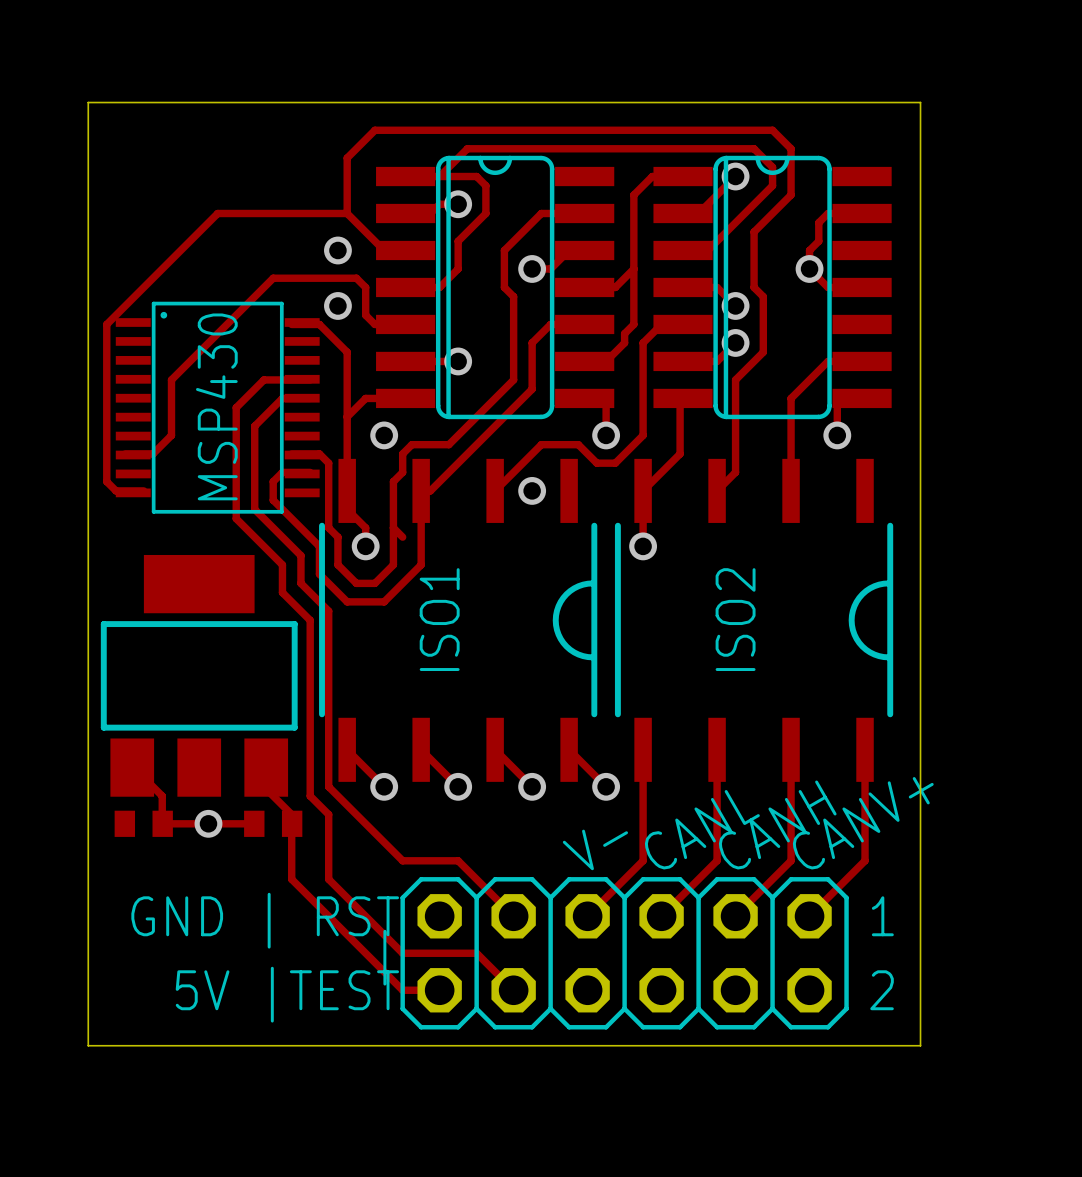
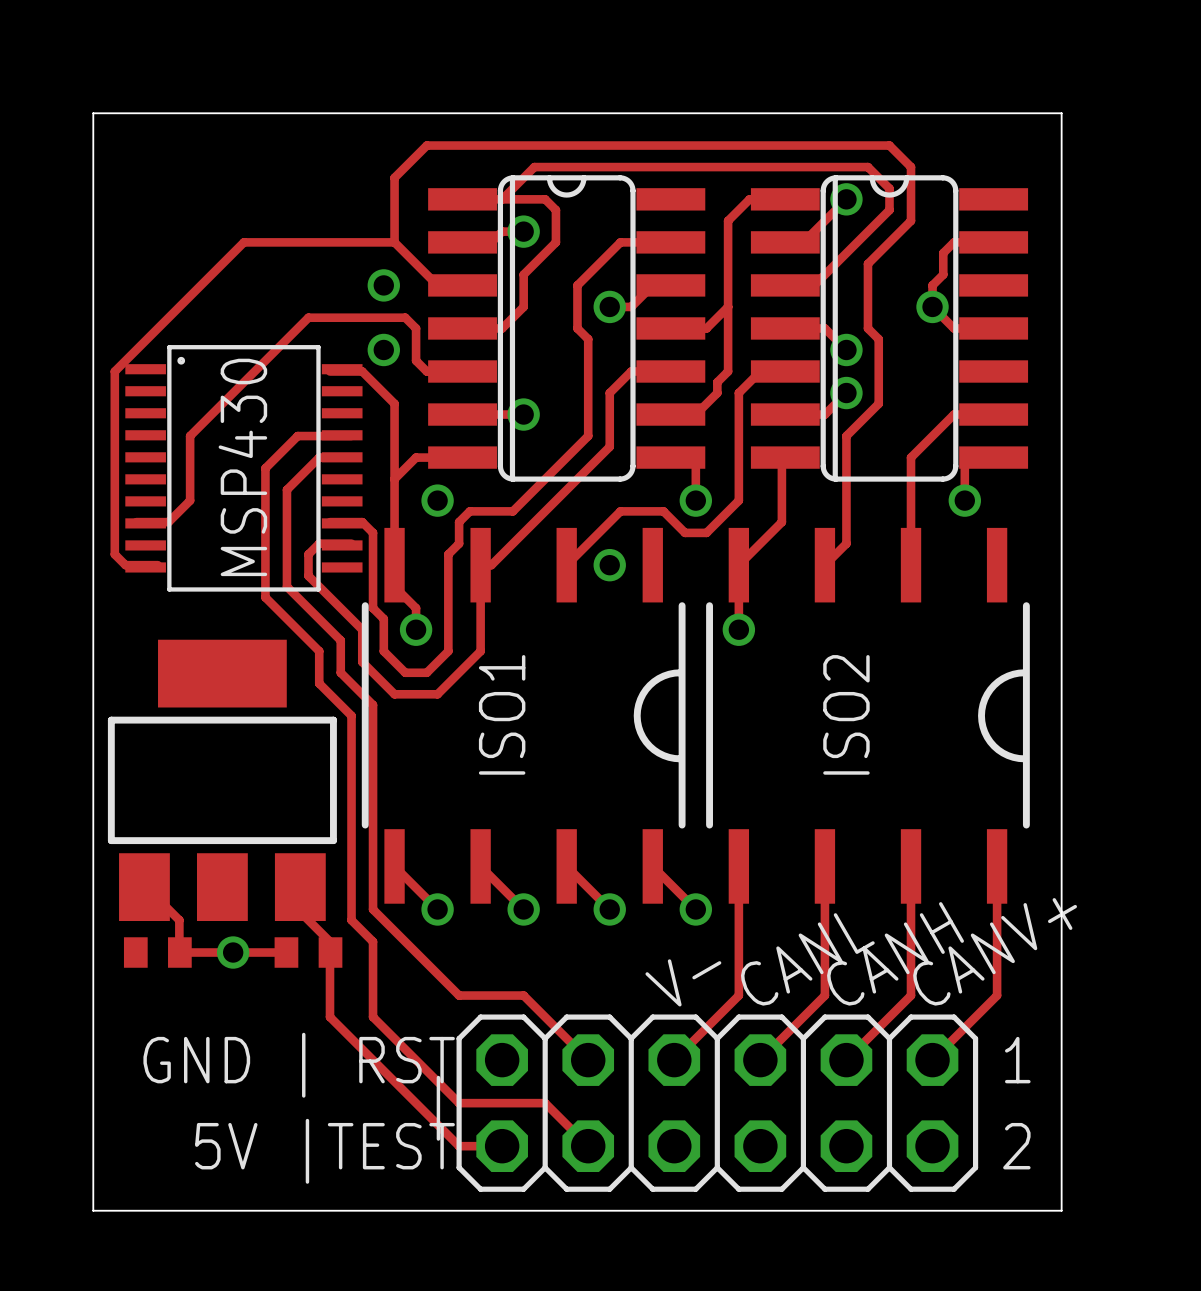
track: (393, 527) (402, 537) -> none

